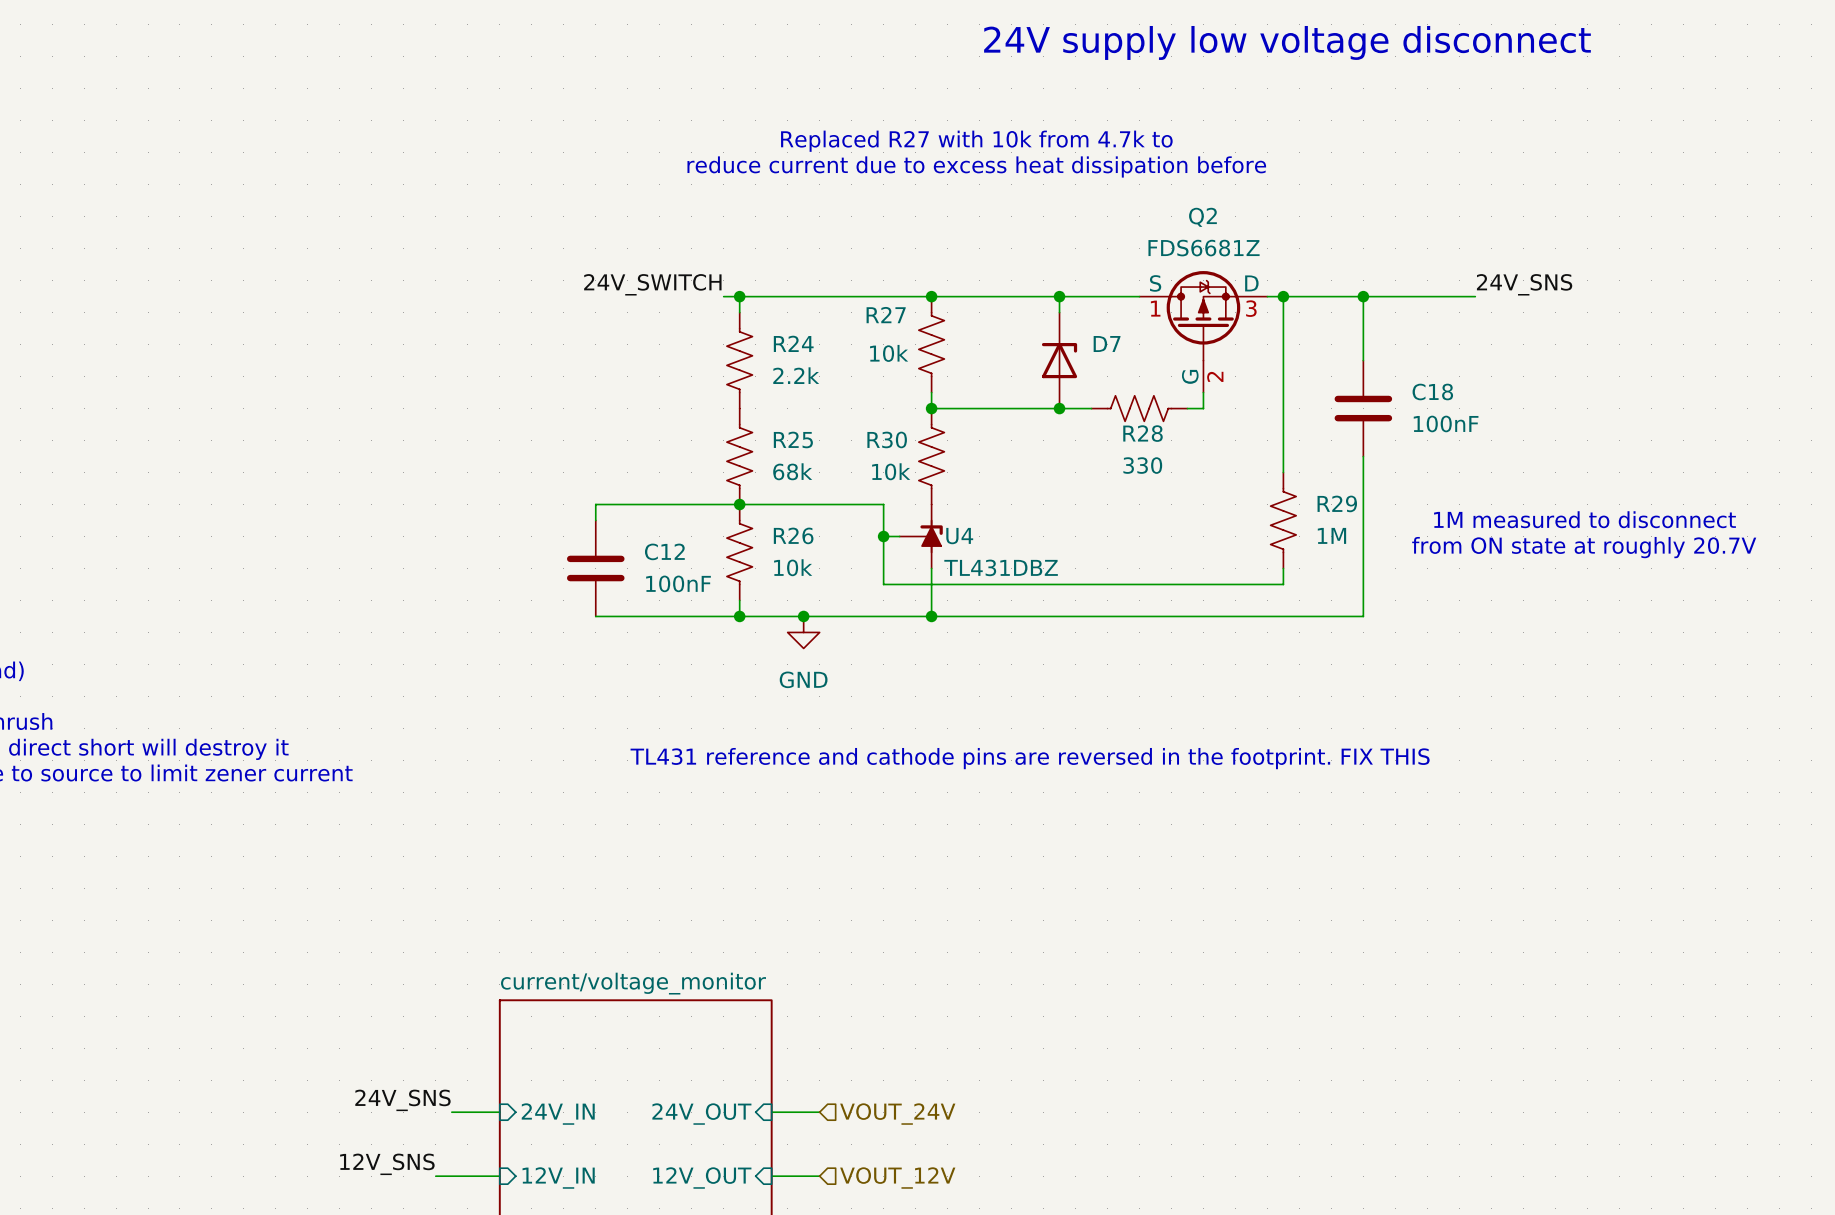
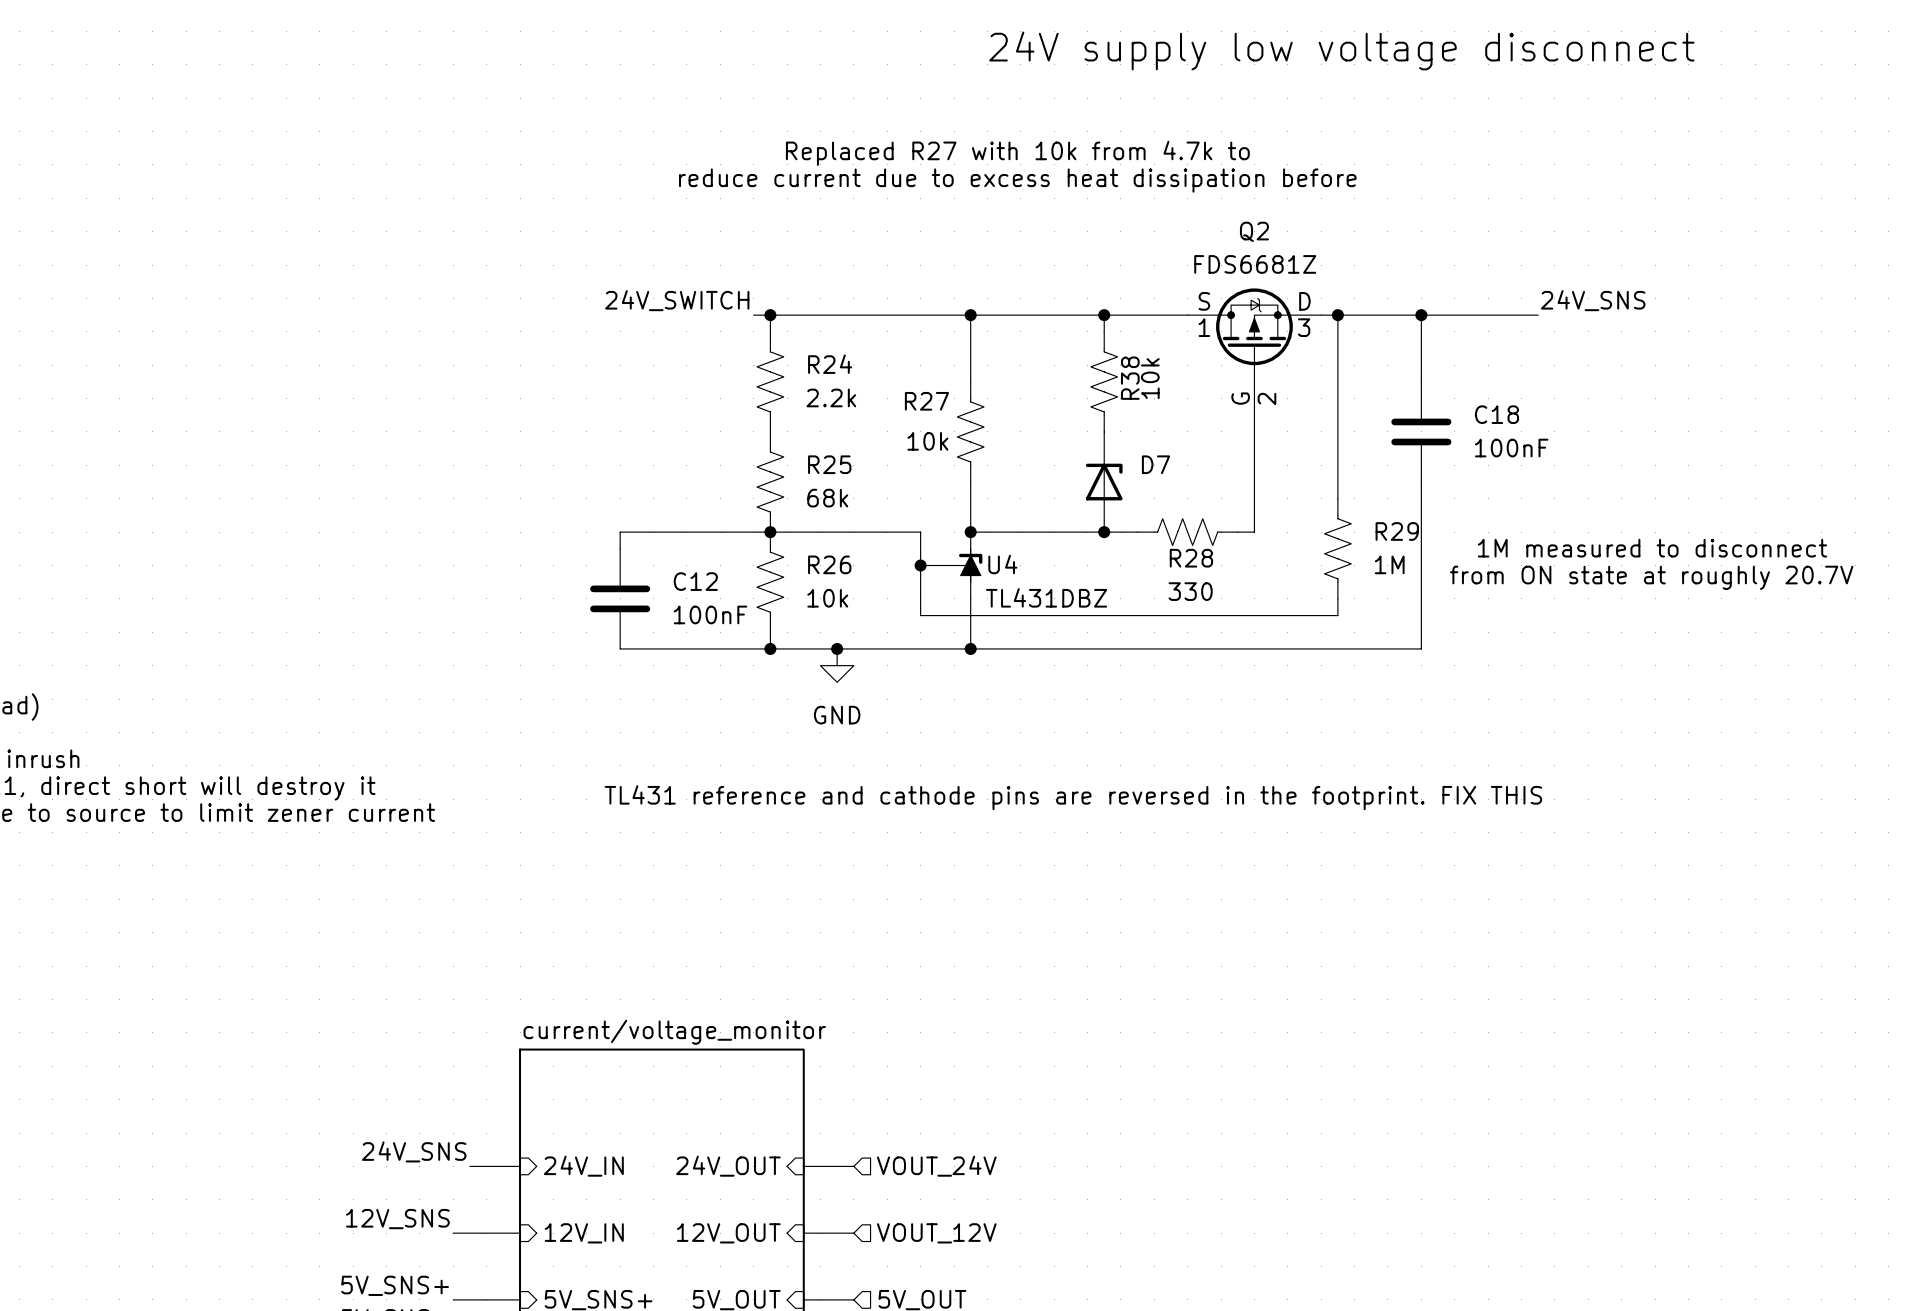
wire: none -> (970, 315) (970, 381)
R27 position: (931, 344) -> (970, 431)
D7 position: (1059, 360) -> (1104, 482)
R38: none -> 10k (1104, 381)
wire: (931, 392) (931, 408) (1091, 408) -> none
junction: (931, 408) -> none
junction: (1059, 408) -> none
R28 position: (1139, 408) -> (1187, 532)
wire: (1187, 408) (1203, 408) -> (1237, 532) (1254, 532) (1254, 431)
wire: none -> (970, 482) (970, 532) (1137, 532)
R30: 10k (931, 456) -> none
junction: none -> (970, 532)
junction: none -> (1104, 532)

